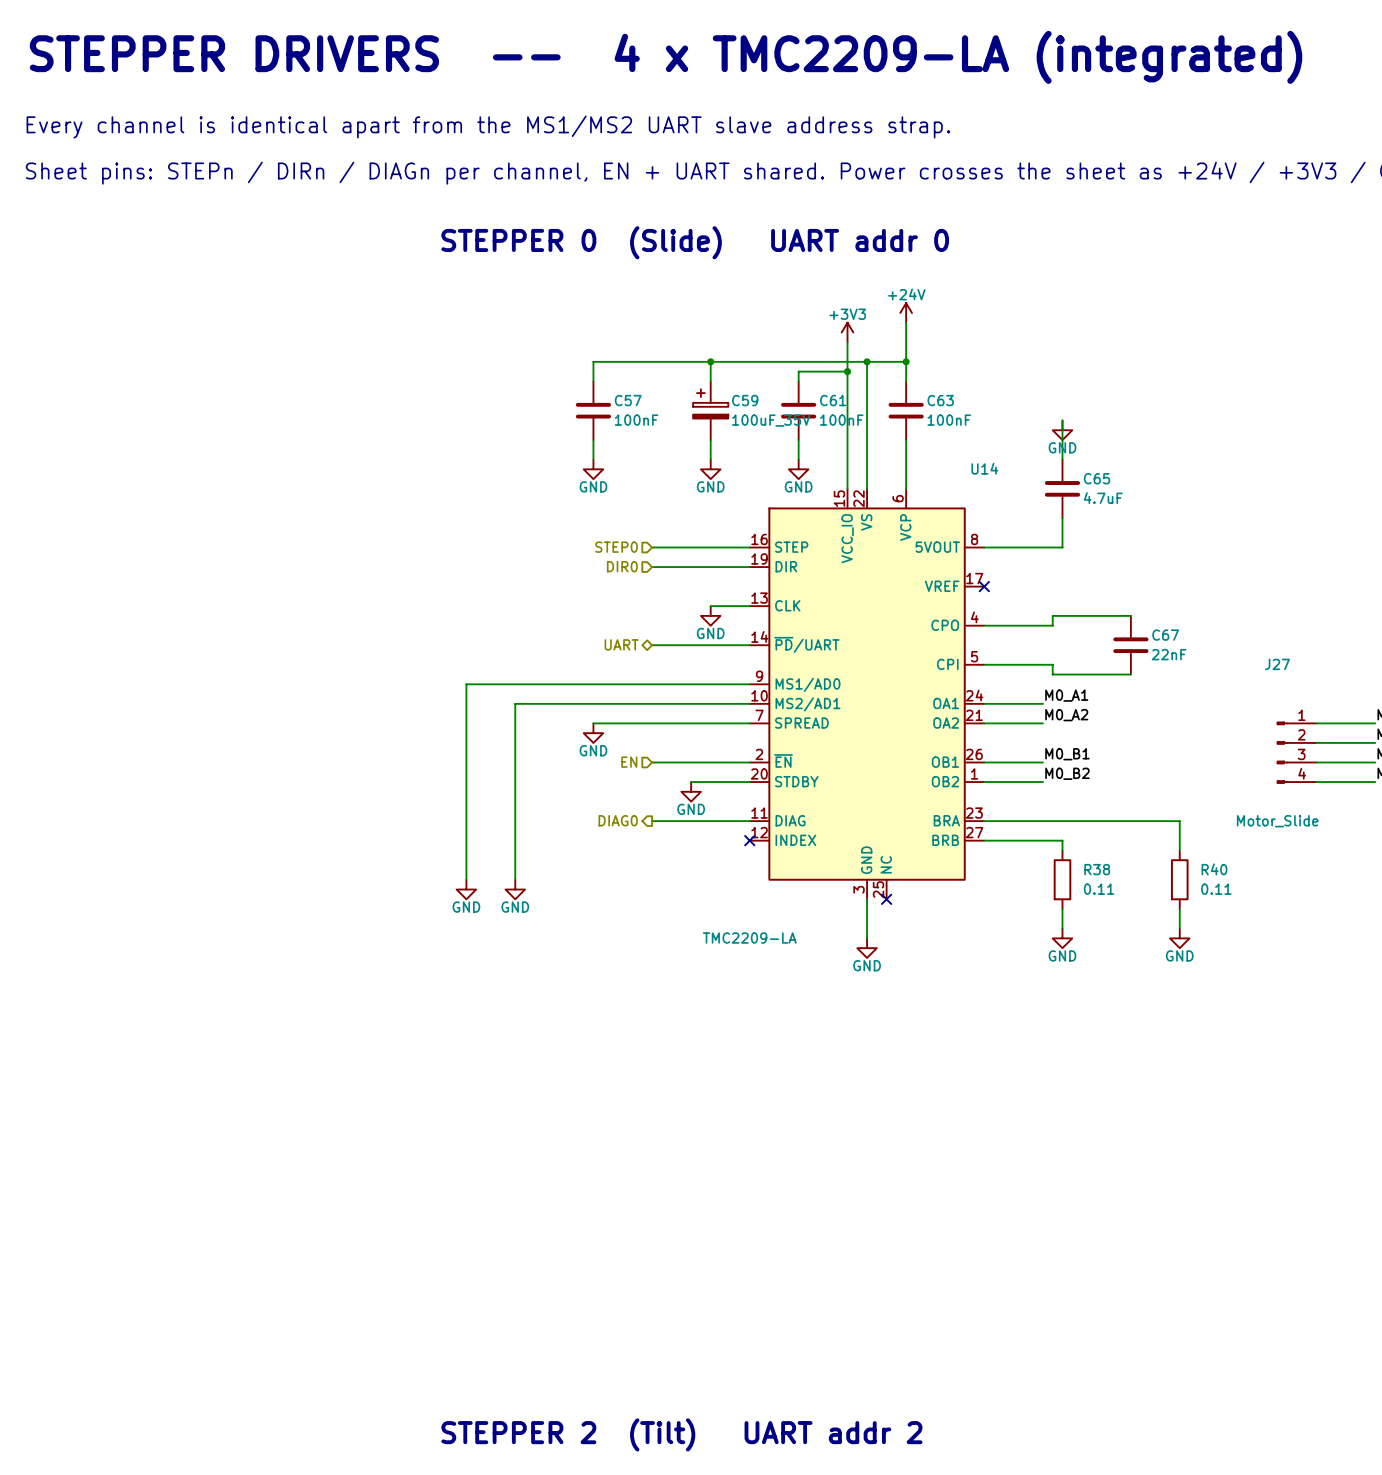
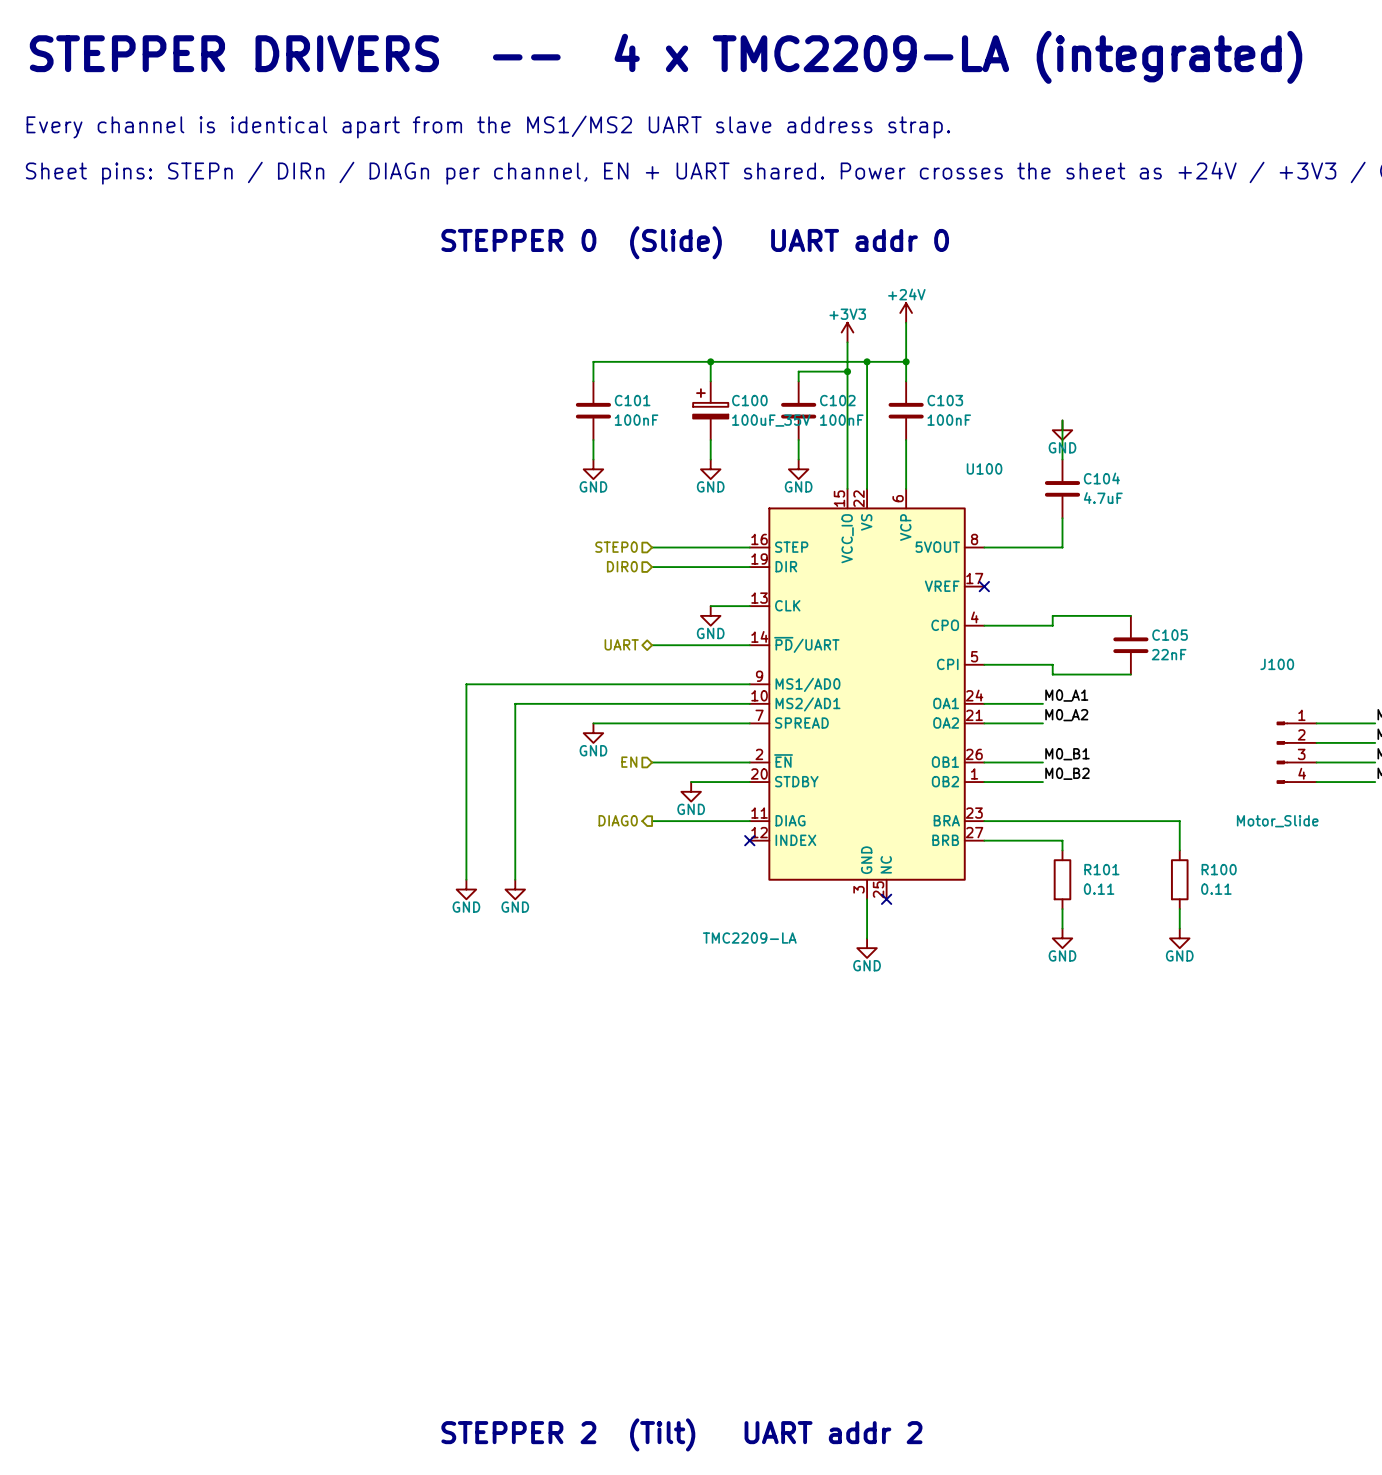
C57 name: C57 (628, 400) -> C101 (632, 400)
C59 name: C59 (745, 400) -> C100 (749, 400)
C61 name: C61 (833, 400) -> C102 (837, 400)
C63 name: C63 (940, 400) -> C103 (945, 400)
U14 name: U14 (984, 468) -> U100 (984, 468)
C65 name: C65 (1097, 478) -> C104 (1101, 478)
C67 name: C67 (1165, 635) -> C105 (1170, 635)
J27 name: J27 (1277, 664) -> J100 (1277, 664)
R38 name: R38 (1097, 869) -> R101 (1101, 869)
R40 name: R40 (1214, 869) -> R100 (1219, 869)

